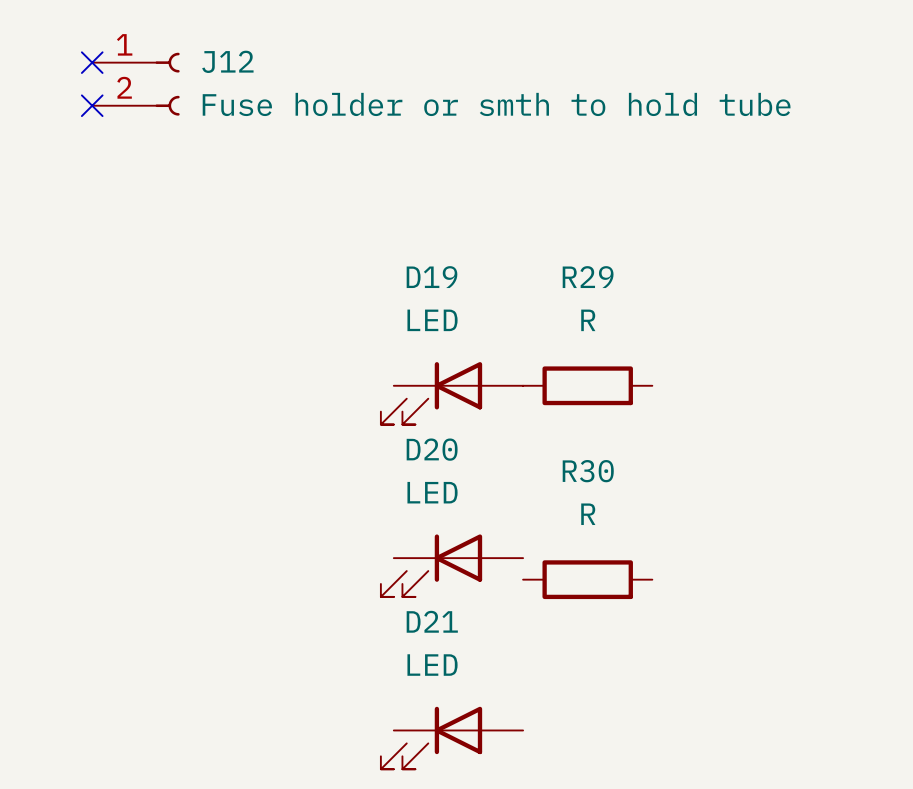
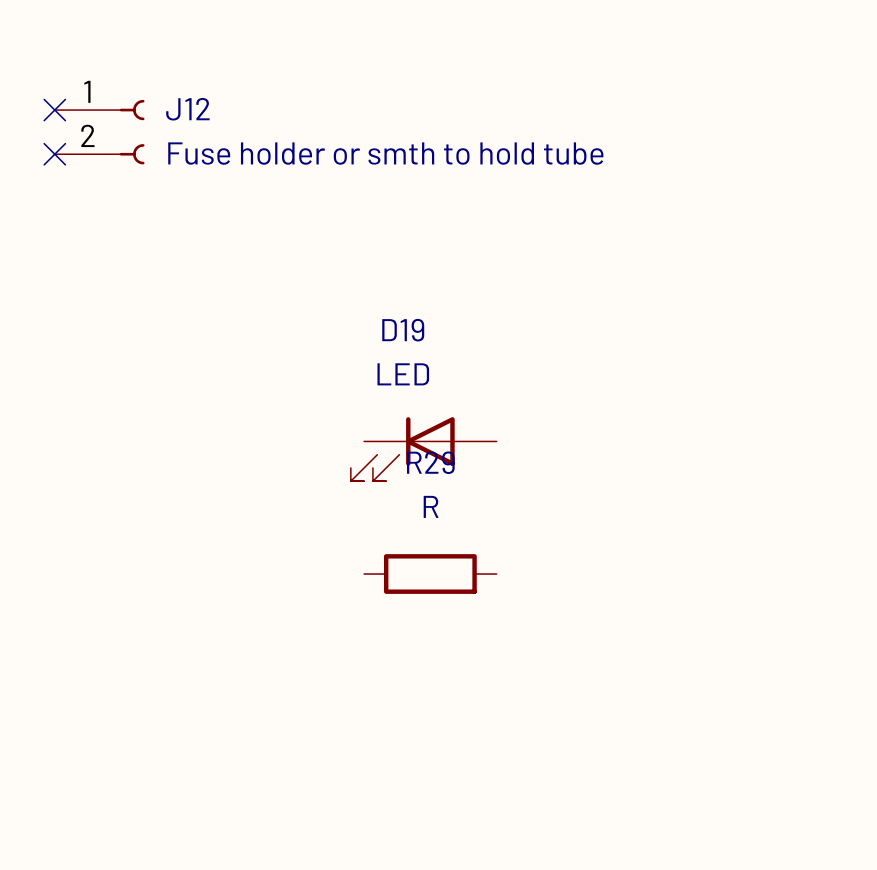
R29 position: (587, 385) -> (430, 574)
D20: LED (451, 565) -> none
R30: R (587, 579) -> none
D21: LED (451, 738) -> none

